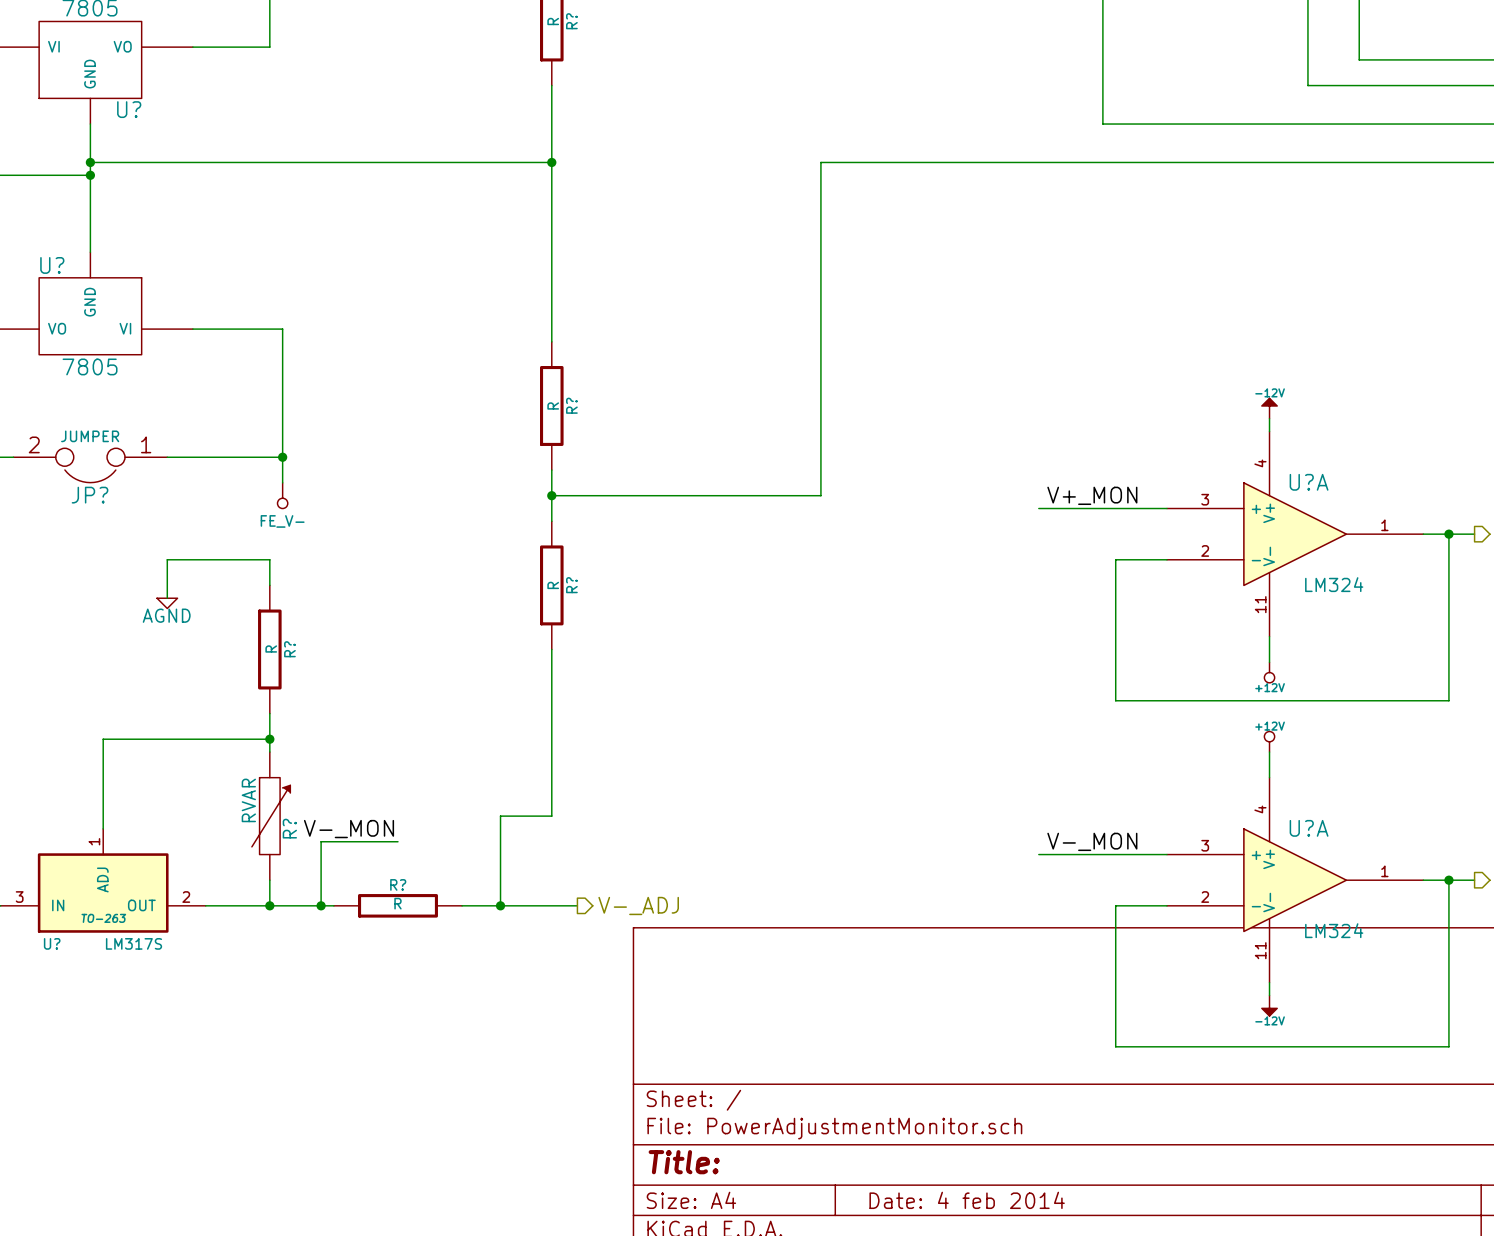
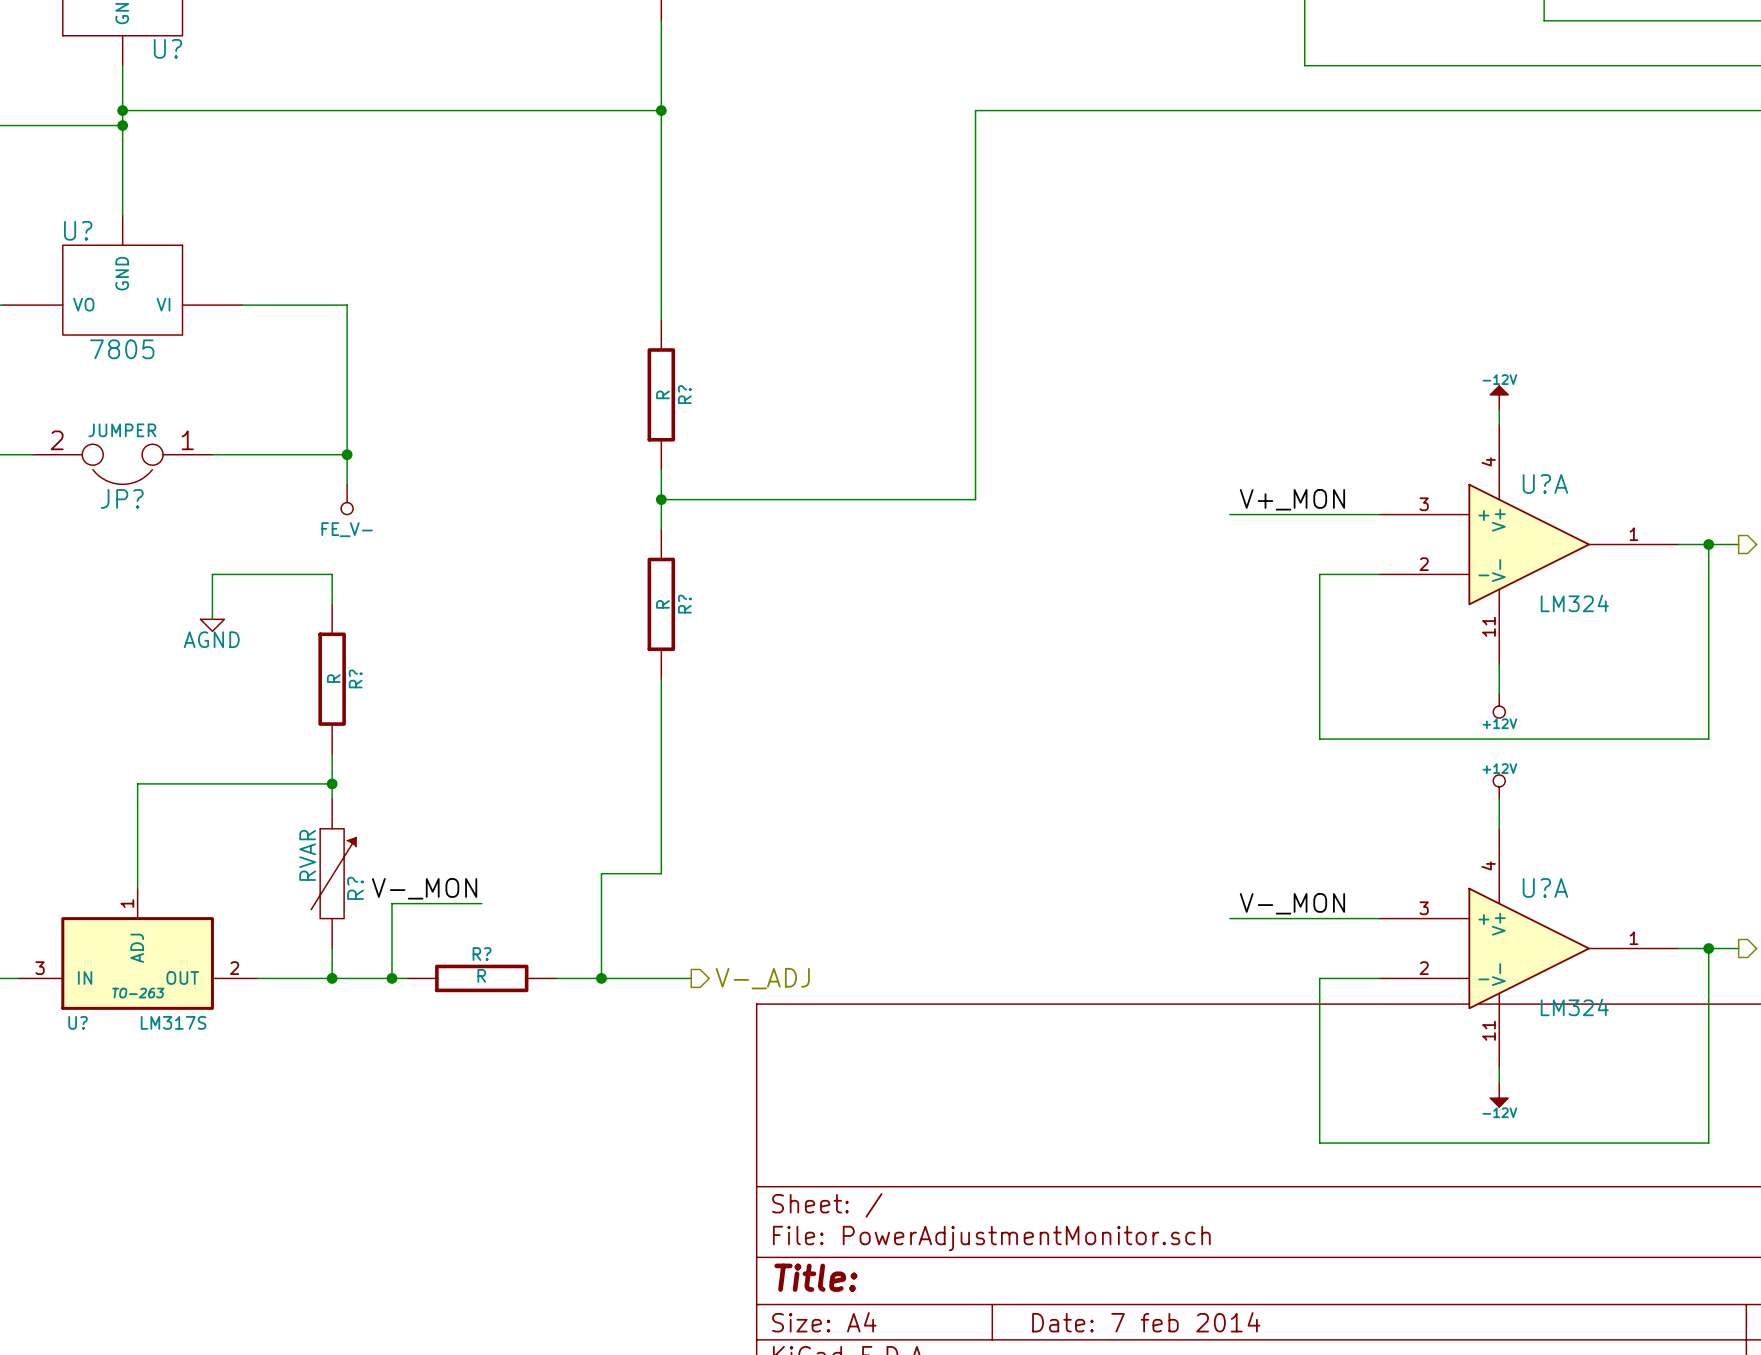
title block: Date: 4 feb 2014 (967, 1200) -> Date: 7 feb 2014 (1146, 1322)

